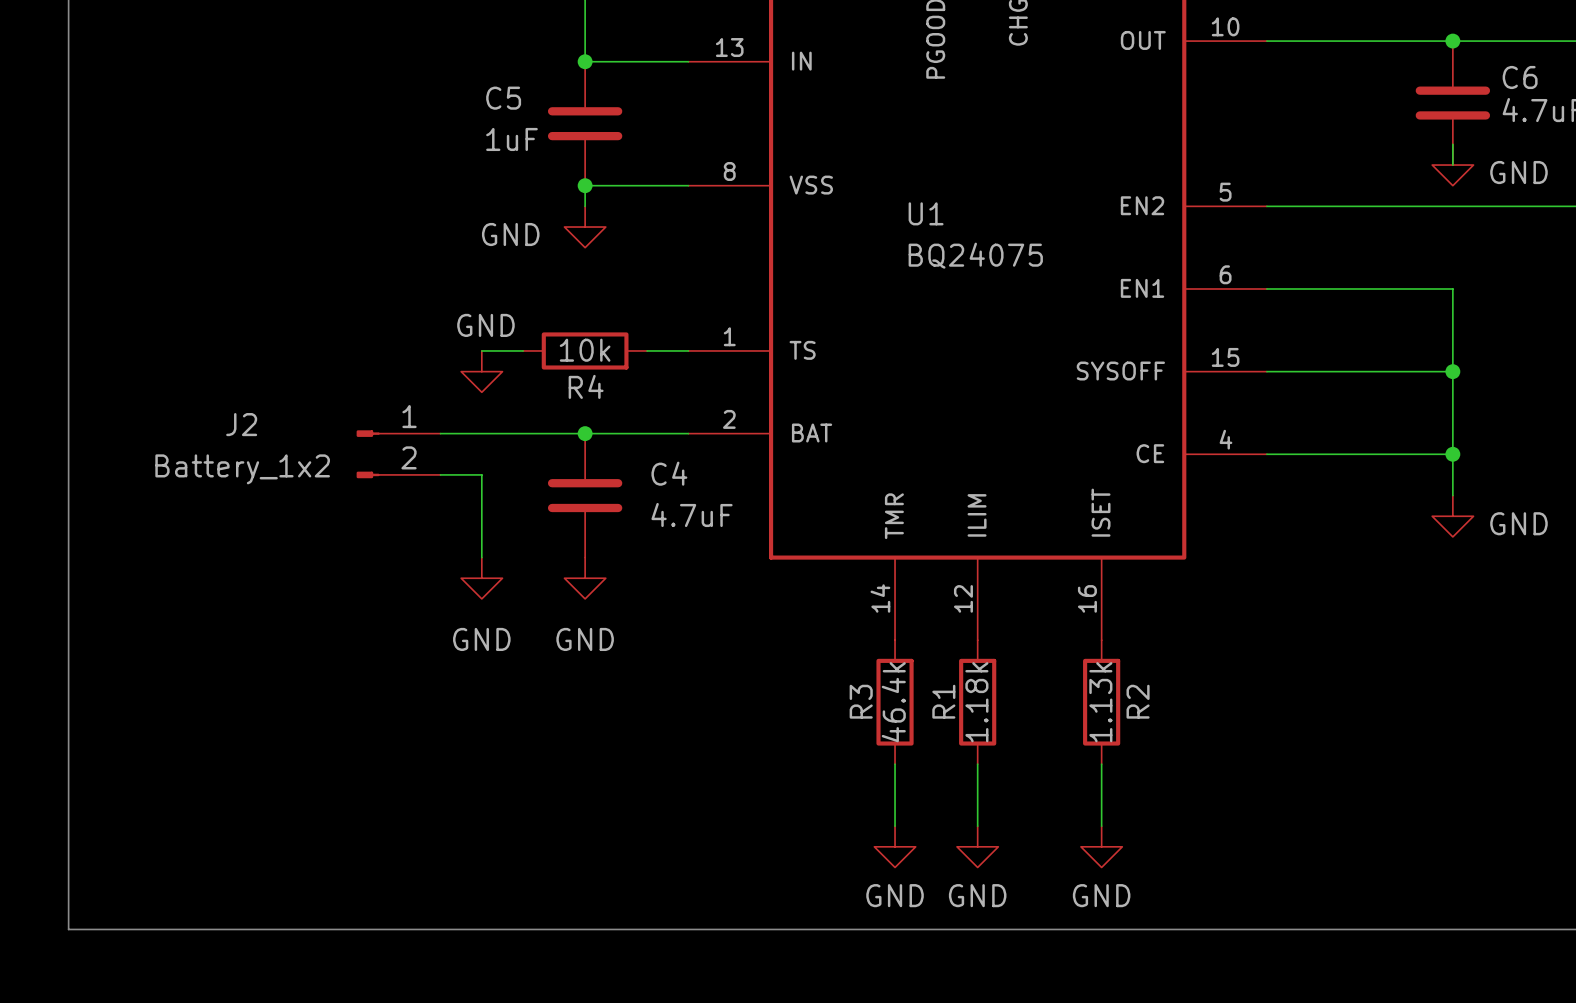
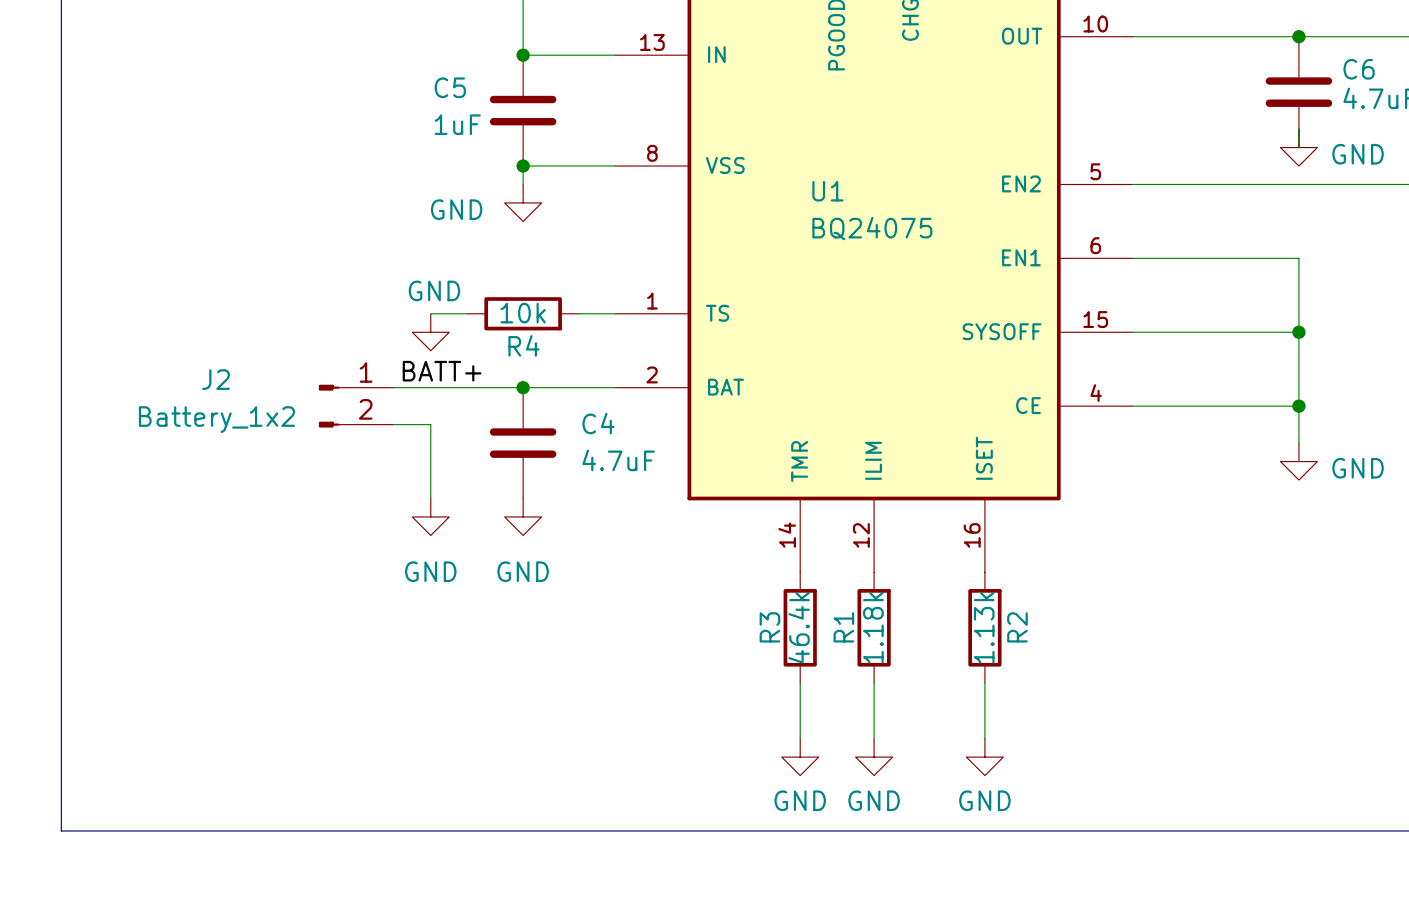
label: none -> BATT+ (442, 371)

